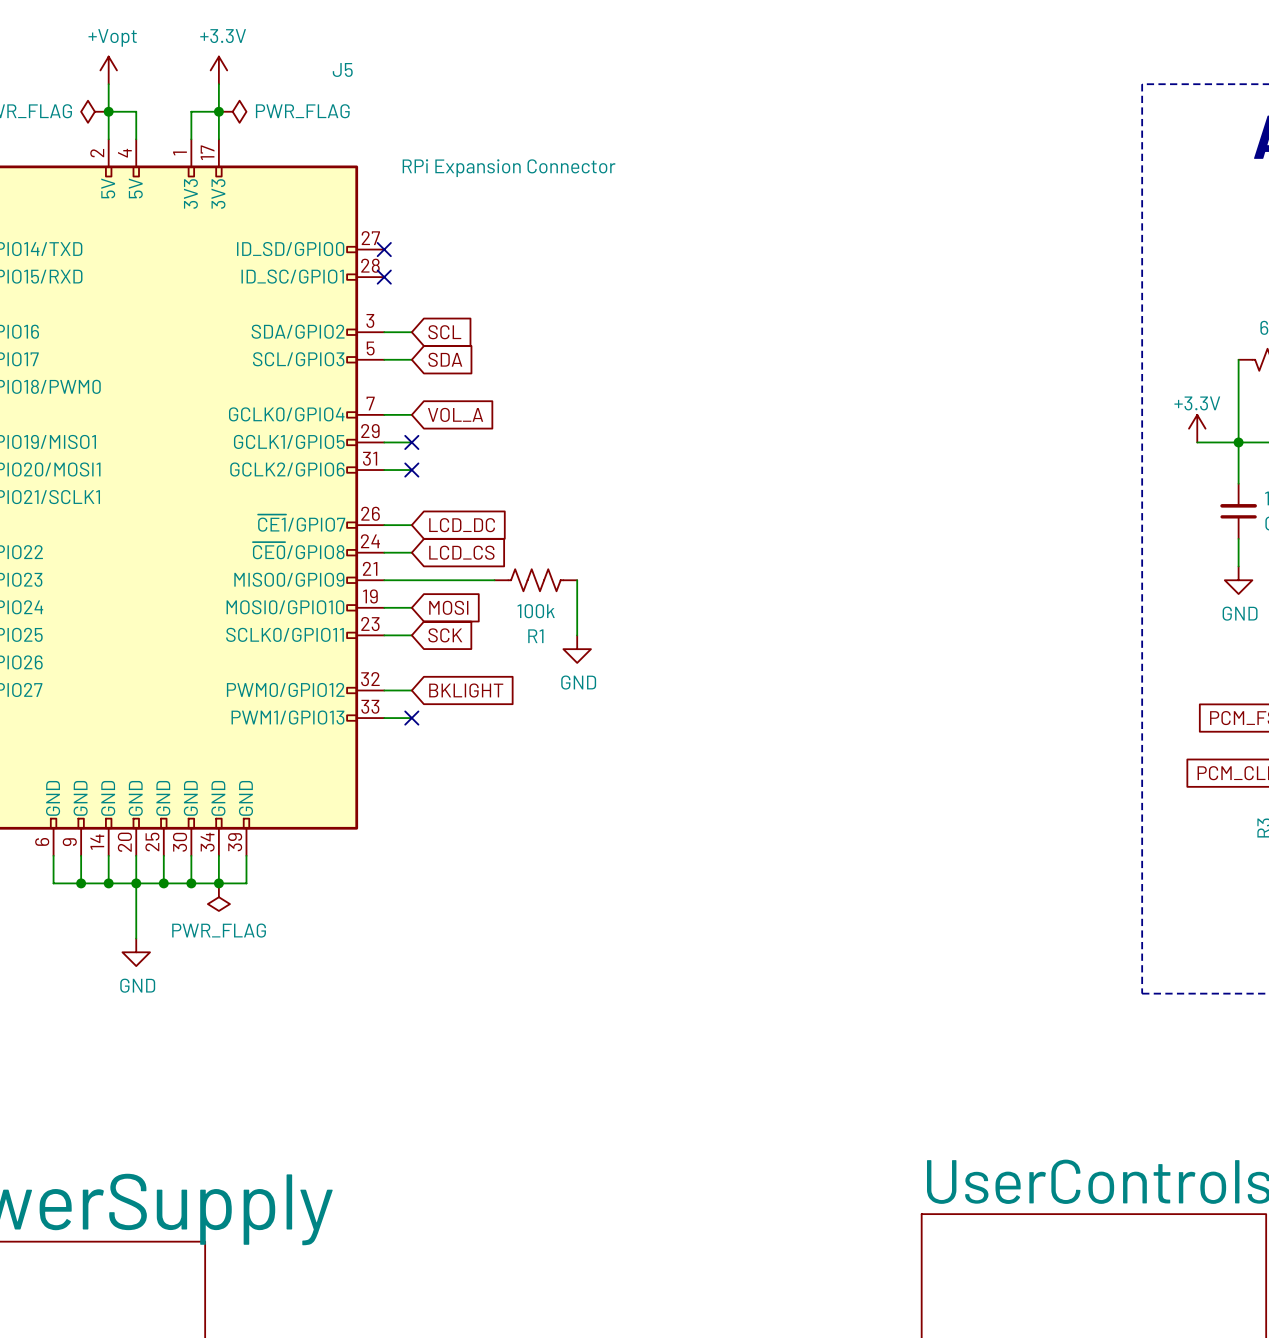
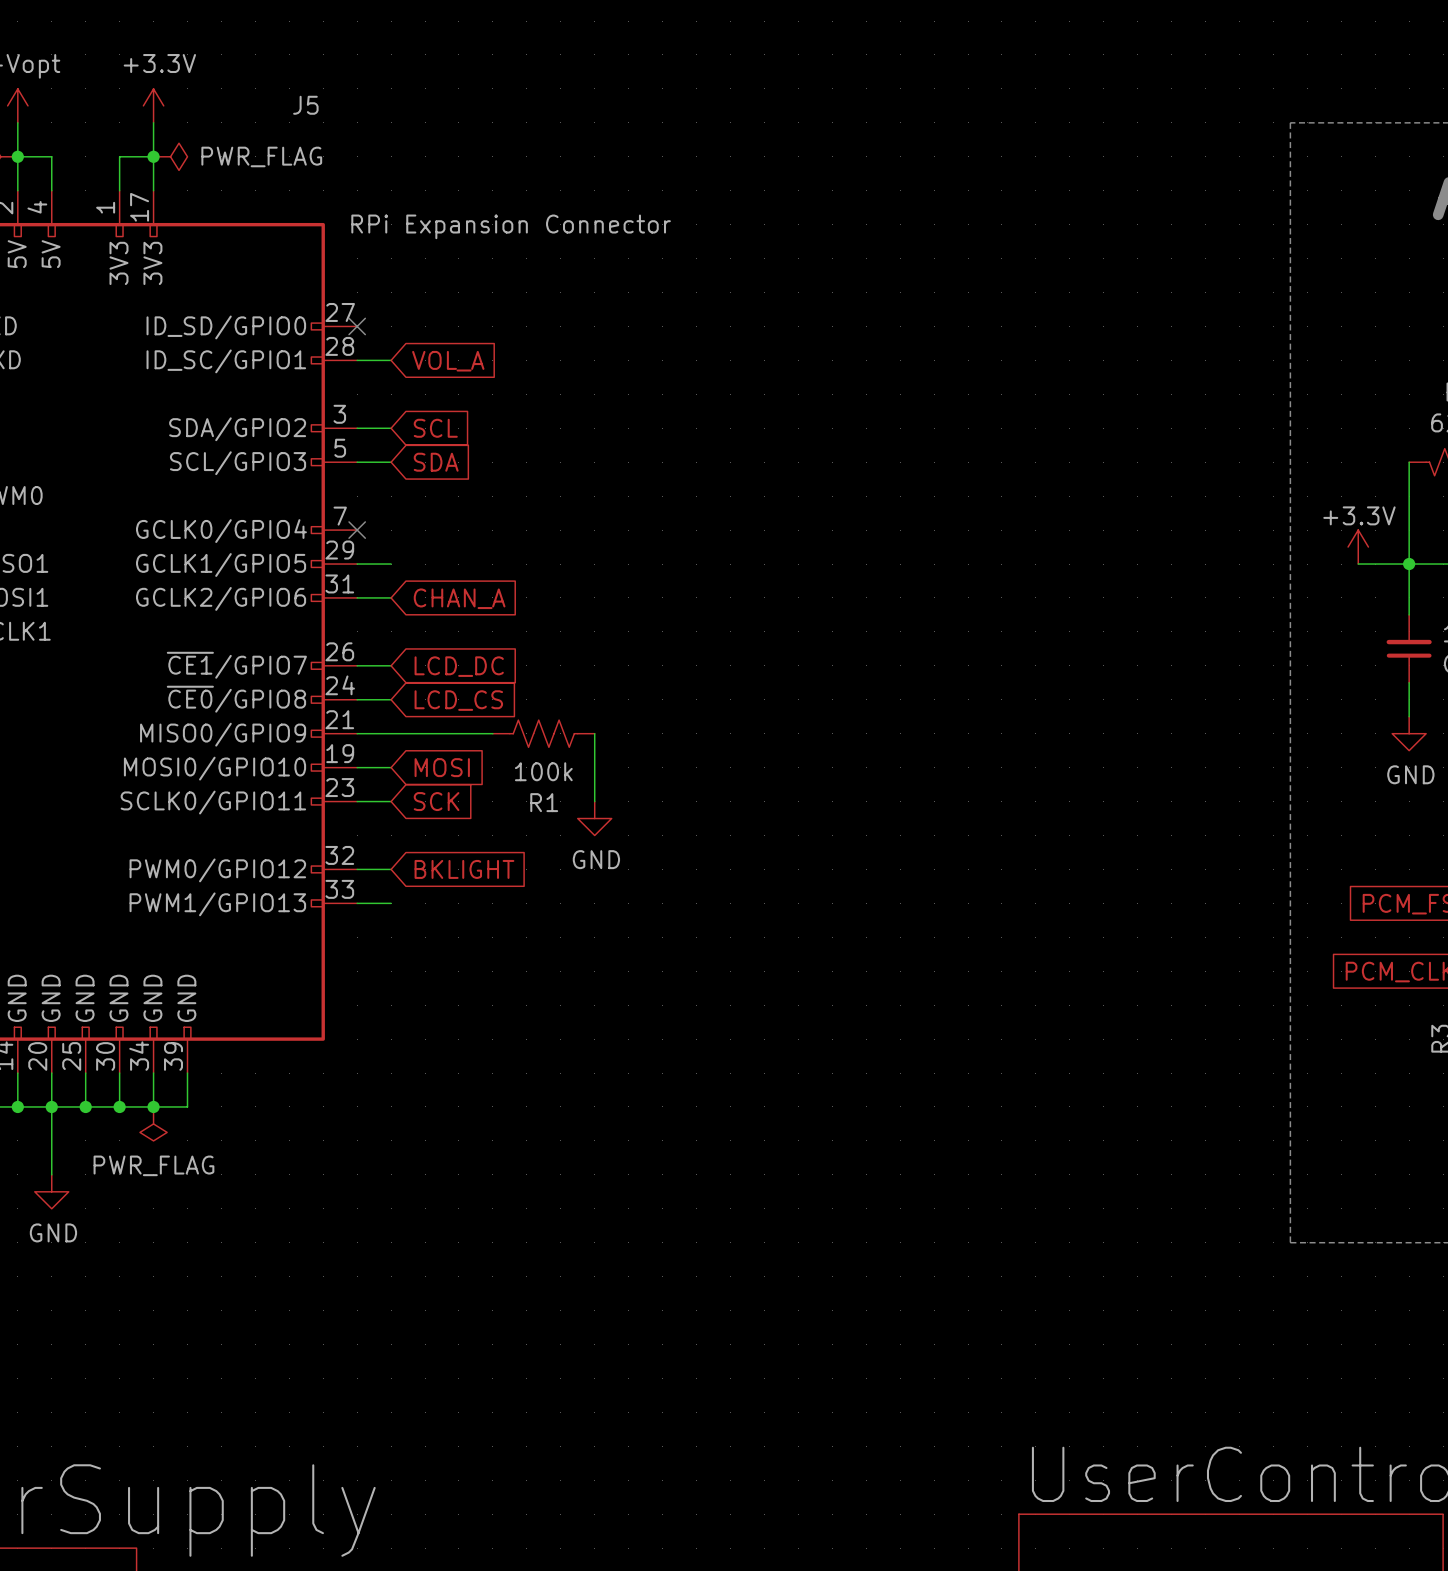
no-connect mark: (384, 277) -> none
wire: (384, 414) (411, 414) -> (357, 360) (391, 360)
no-connect mark: none -> (357, 530)
global label position: VOL_A (455, 414) -> VOL_A (448, 361)
no-connect mark: (411, 442) -> none
no-connect mark: (411, 470) -> none
global label: none -> CHAN_A (459, 598)
no-connect mark: (411, 718) -> none

